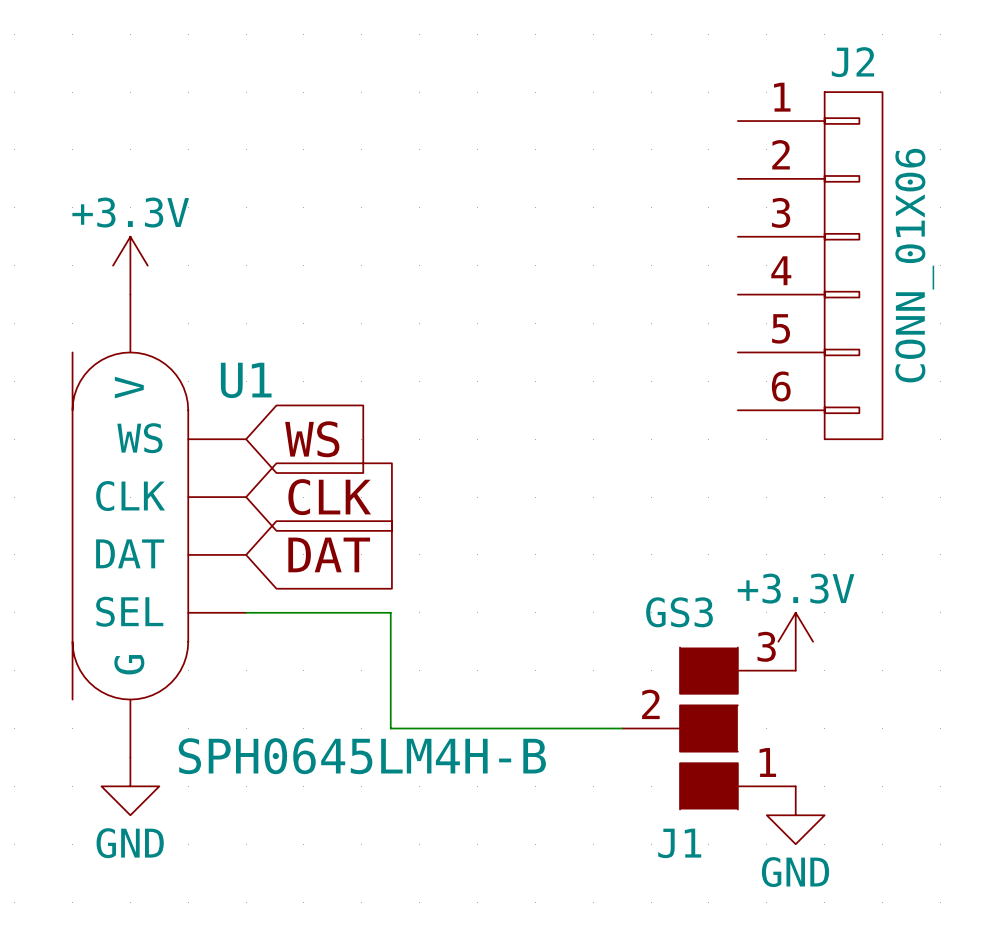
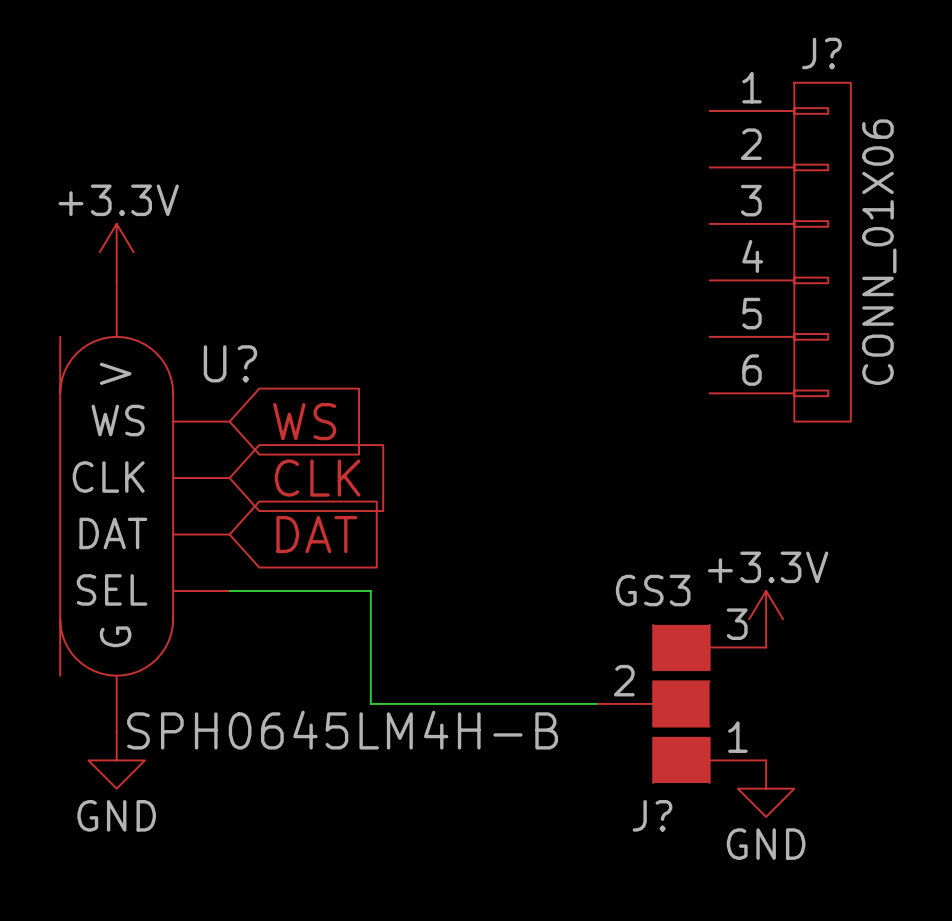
J2 name: J2 (852, 62) -> J? (821, 53)
U1 name: U1 (246, 380) -> U? (230, 363)
J1 name: J1 (679, 843) -> J? (652, 815)

